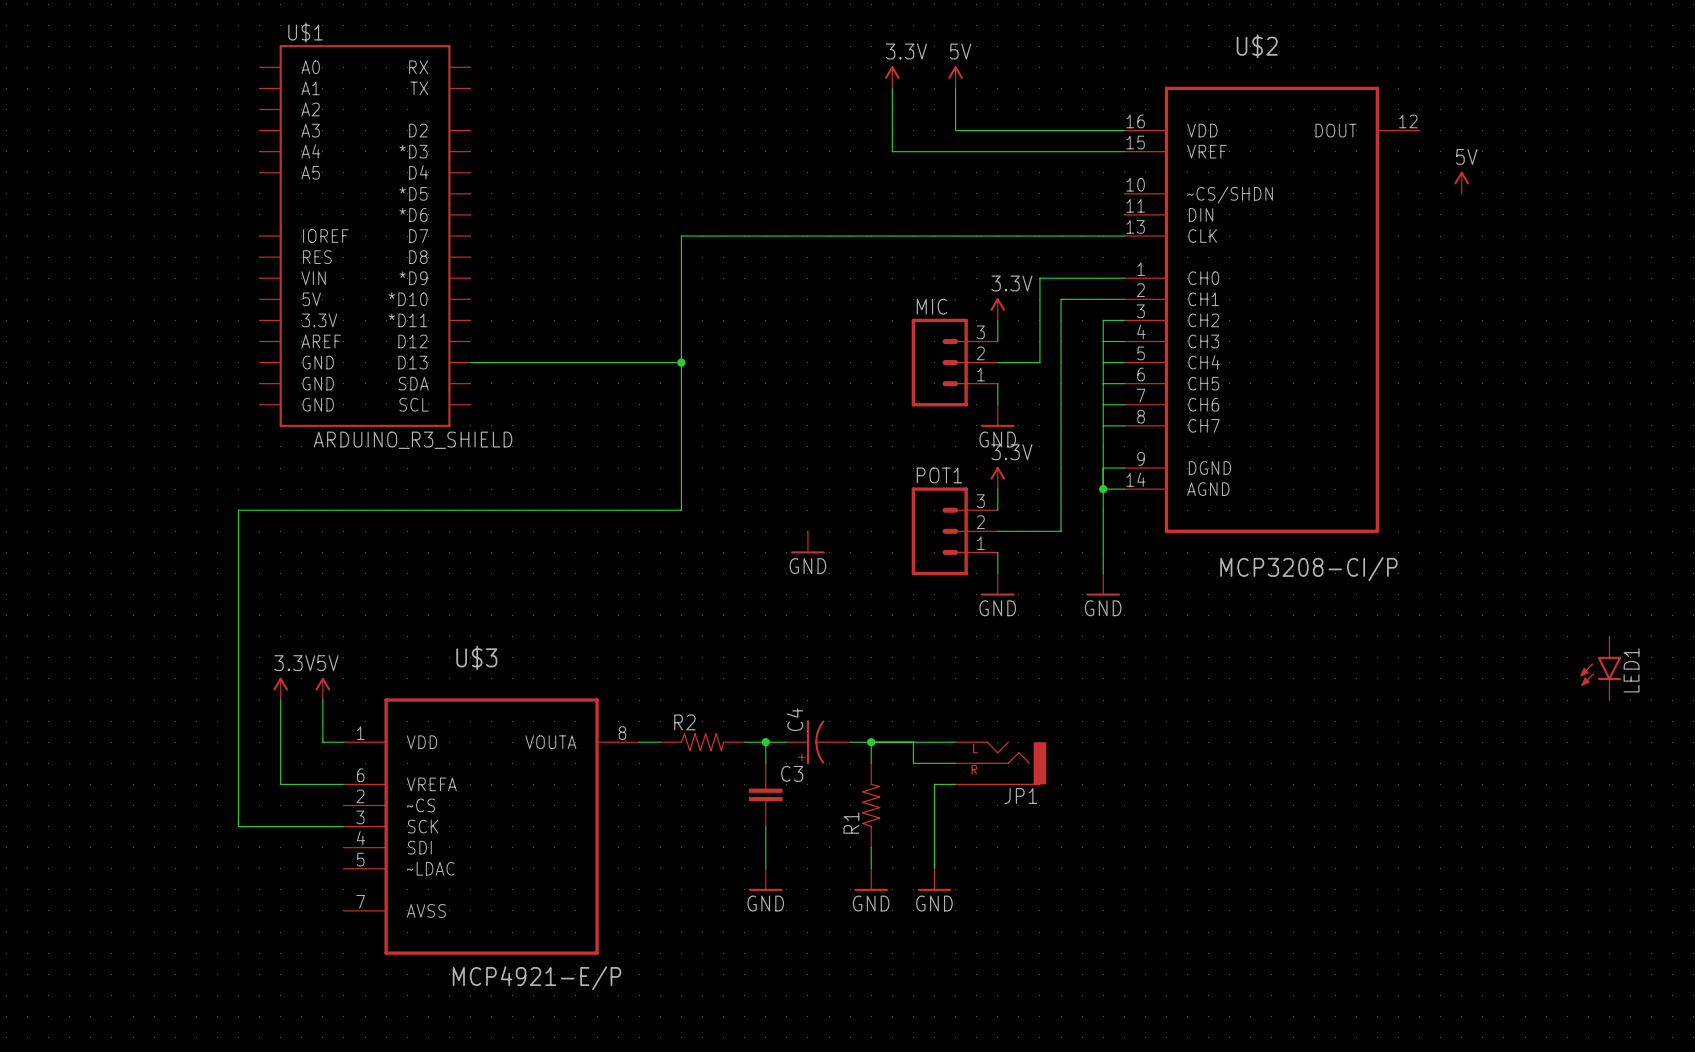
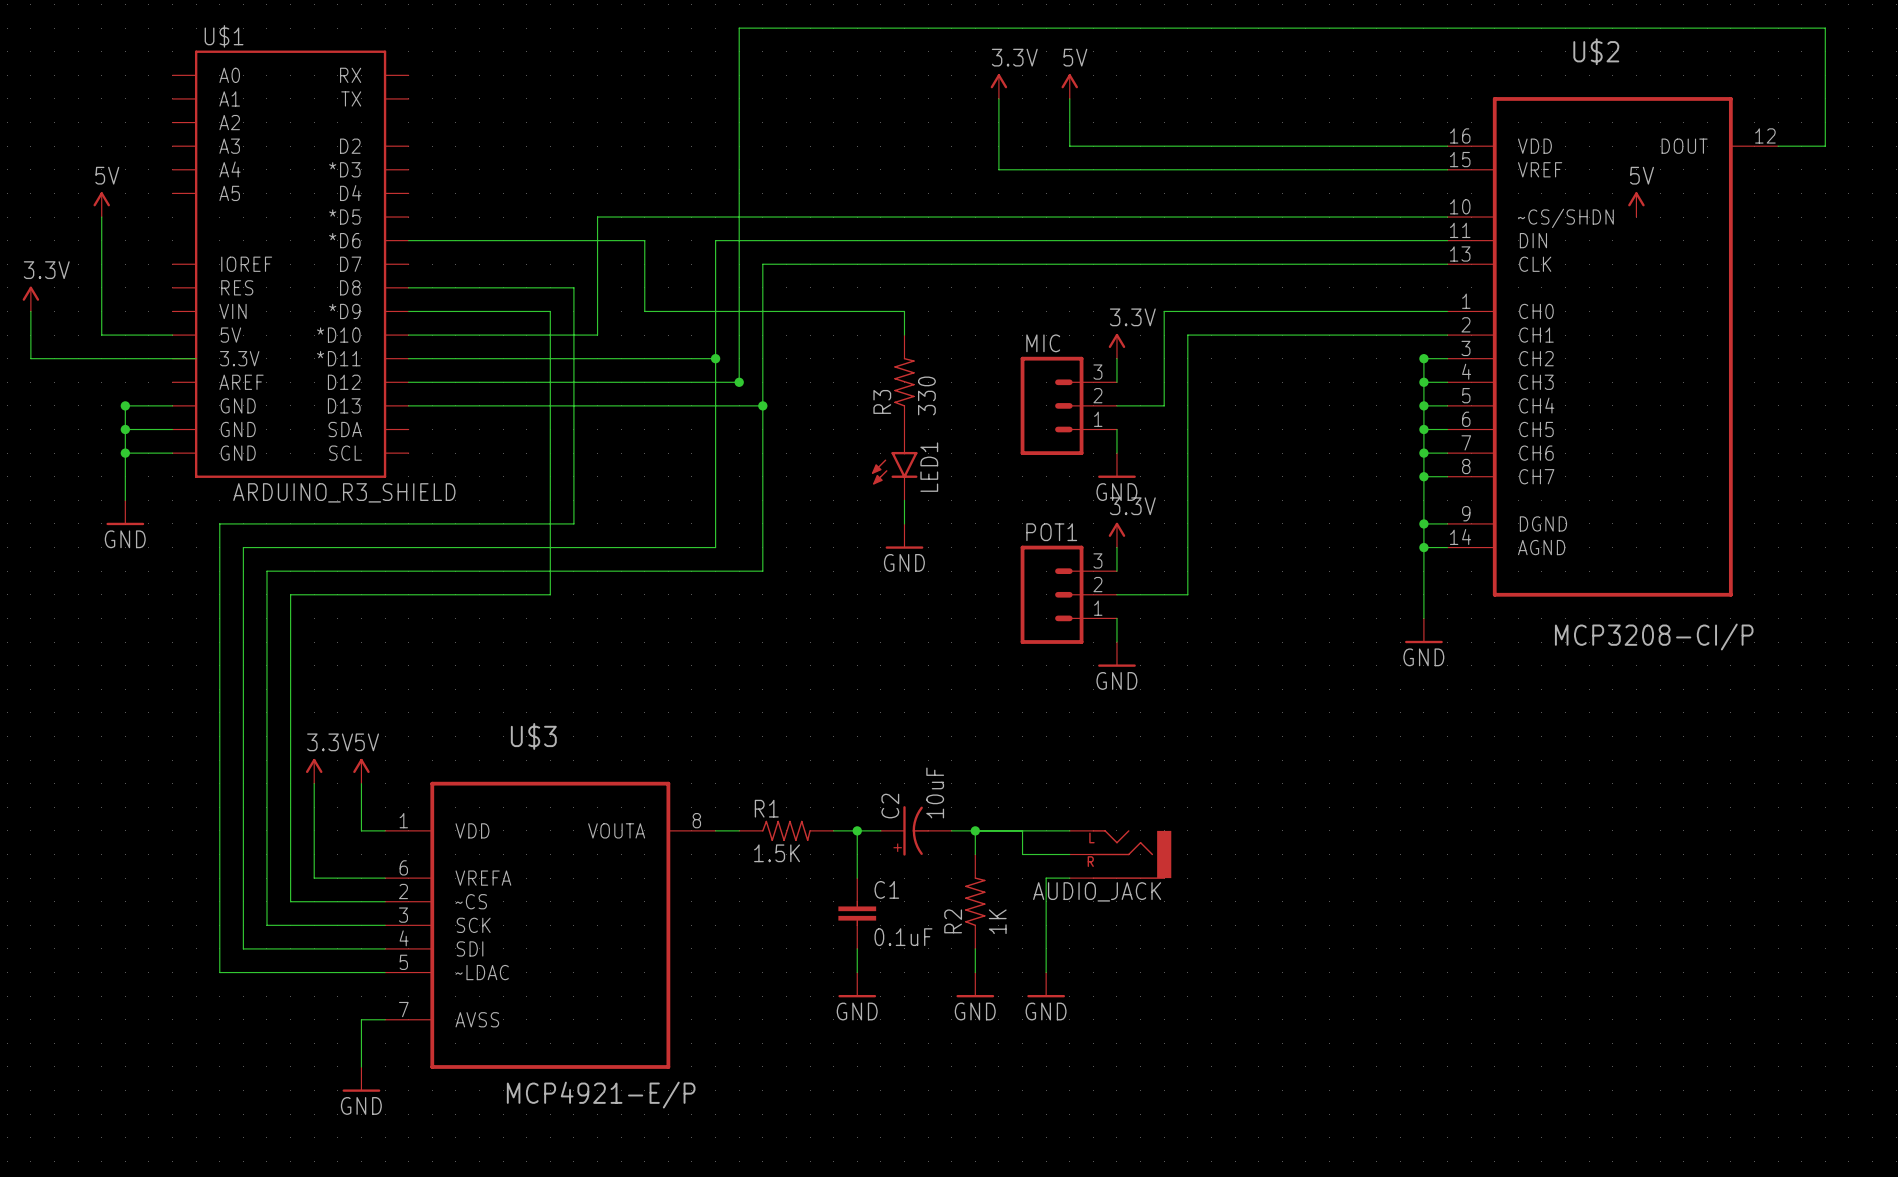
wire: none -> (1258, 146) (1447, 146)
wire: none -> (1778, 146) (1825, 146) (1825, 28) (739, 28) (739, 382) (408, 382)
wire: none -> (1258, 169) (1447, 169)
power symbol: none -> 5V (101, 204)
wire: none -> (101, 217) (101, 335) (172, 335)
wire: none -> (1447, 217) (597, 217) (597, 335) (408, 335)
wire: none -> (408, 240) (644, 240) (644, 311) (904, 311) (904, 335)
wire: none -> (1447, 240) (715, 240) (715, 547) (243, 547) (243, 948) (385, 948)
U$1 position: (365, 236) -> (290, 264)
wire: none -> (1258, 264) (1447, 264)
wire: none -> (408, 287) (573, 287) (573, 523) (219, 523) (219, 972) (385, 972)
power symbol: none -> 3.3V (30, 299)
wire: none -> (30, 311) (30, 358) (196, 358)
wire: none -> (408, 311) (550, 311) (550, 594) (290, 594) (290, 901) (385, 901)
wire: none -> (1258, 311) (1447, 311)
wire: none -> (1258, 335) (1447, 335)
U$2 position: (1271, 309) -> (1612, 346)
wire: none -> (408, 358) (715, 358)
junction: none -> (715, 358)
wire: (1124, 320) (1103, 320) (1103, 573) -> none
junction: none -> (1423, 358)
wire: none -> (1447, 358) (1423, 358) (1423, 618)
junction: none -> (739, 382)
R3: none -> 330 (904, 382)
wire: (1103, 341) (1124, 341) -> (1423, 382) (1447, 382)
junction: none -> (1423, 382)
junction: none -> (125, 405)
wire: none -> (172, 405) (125, 405) (125, 500)
wire: none -> (408, 405) (526, 405)
wire: (1103, 362) (1124, 362) -> (1423, 405) (1447, 405)
junction: none -> (1423, 405)
wire: none -> (125, 429) (172, 429)
junction: none -> (125, 429)
wire: (1103, 383) (1124, 383) -> (1423, 429) (1447, 429)
junction: none -> (1423, 429)
wire: none -> (125, 453) (172, 453)
junction: none -> (125, 453)
wire: (1103, 404) (1124, 404) -> (1423, 453) (1447, 453)
junction: none -> (1423, 453)
wire: (1103, 425) (1124, 425) -> (1423, 476) (1447, 476)
junction: none -> (1423, 476)
wire: none -> (904, 500) (904, 523)
power symbol: none -> GND (125, 512)
wire: (1103, 468) (1124, 468) -> (1423, 523) (1447, 523)
junction: none -> (1423, 523)
wire: (1103, 489) (1124, 489) -> (1423, 547) (1447, 547)
junction: (1103, 489) -> none
junction: none -> (1423, 547)
power symbol position: GND (807, 542) -> GND (904, 536)
power symbol: none -> GND (1423, 630)
power symbol: GND (1103, 584) -> none
LED1 position: (1600, 668) -> (894, 464)
C4 value: none -> 10uF (935, 792)
C4 name: C4 (794, 719) -> C2 (890, 806)
R2 name: R2 (684, 722) -> R1 (766, 808)
R2 value: none -> 1.5K (777, 853)
C3: (765, 794) -> none
JP1 name: JP1 (1020, 795) -> AUDIO_JACK (1097, 891)
C1: none -> 0.1uF (857, 913)
R1 name: R1 (851, 823) -> R2 (953, 921)
R1 value: none -> 1K (997, 921)
wire: none -> (385, 1019) (361, 1019) (361, 1066)
power symbol: none -> GND (361, 1079)

